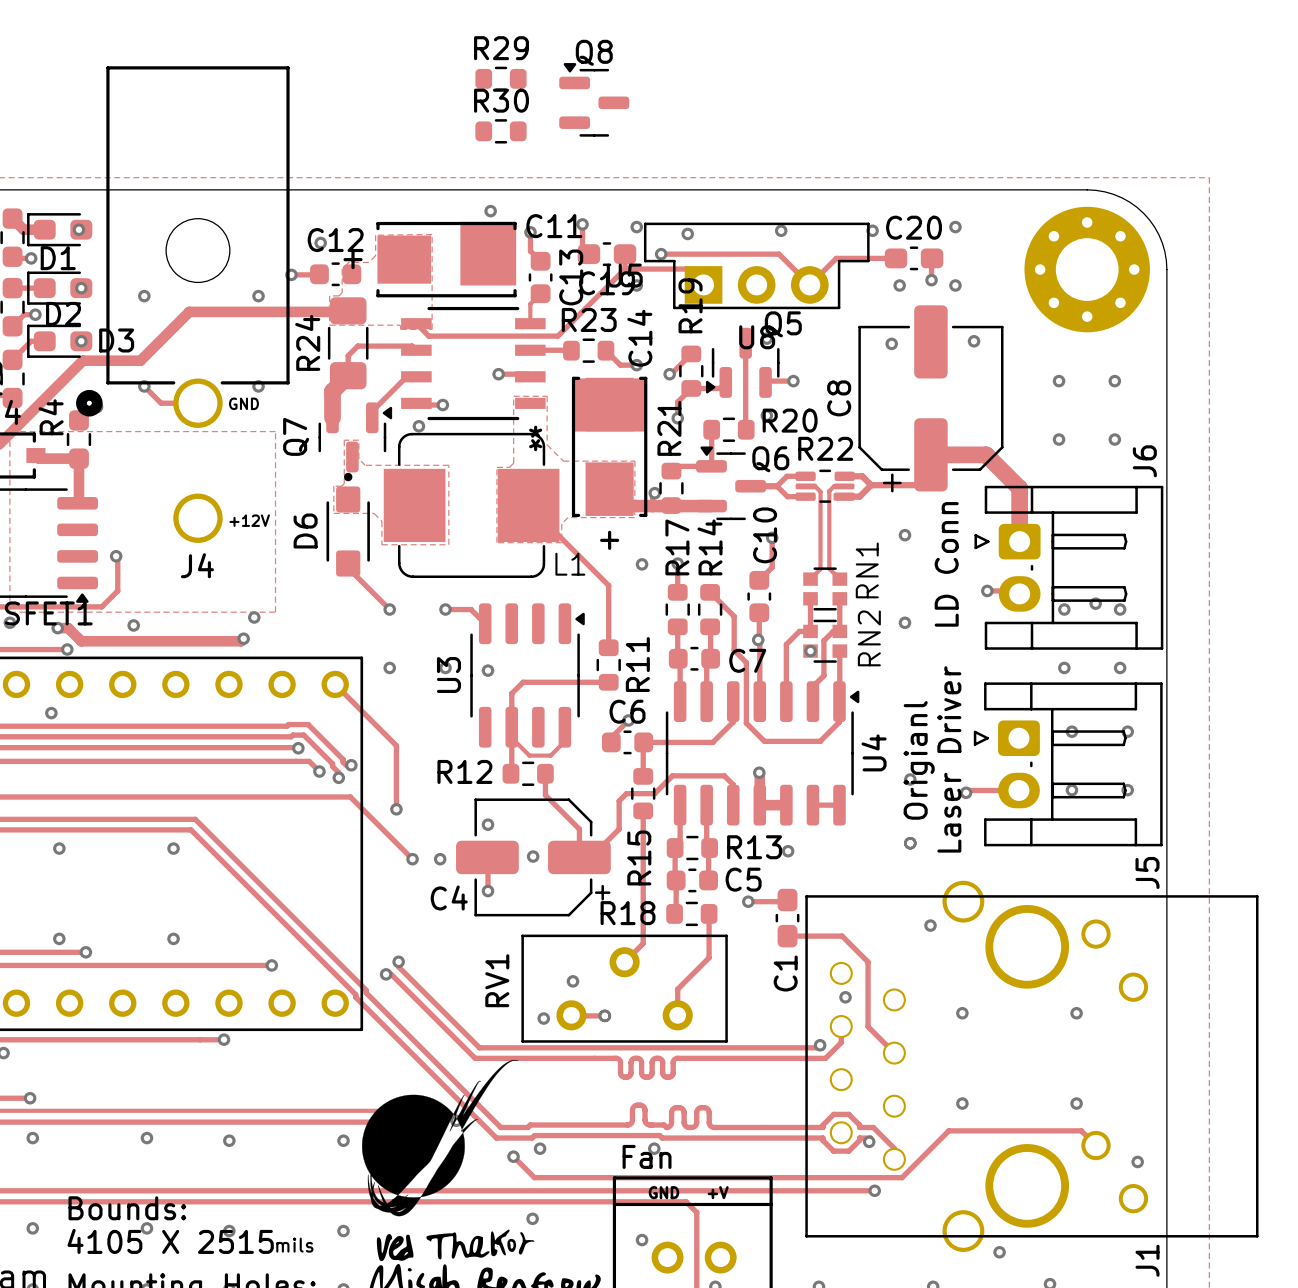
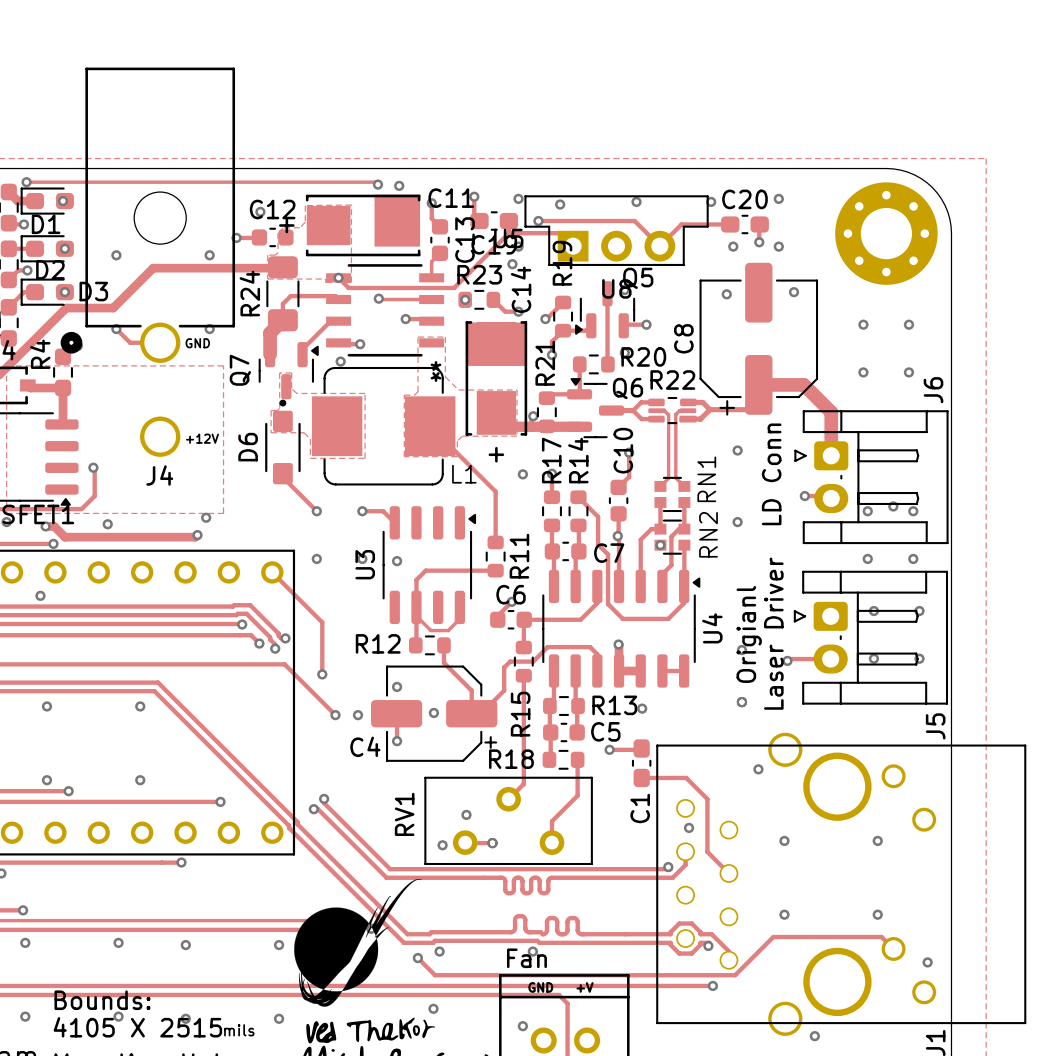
R29: (501, 78) -> none
Q8: (594, 99) -> none
R30: (501, 131) -> none
track: none -> (26, 182) (375, 182) (377, 184)
via: none -> (26, 182)
via: none -> (377, 184)
via: none -> (512, 264)
via: none -> (338, 277)
via: none -> (378, 298)
track: (530, 350) (571, 350) -> (431, 299) (378, 298)
via: none -> (465, 299)

